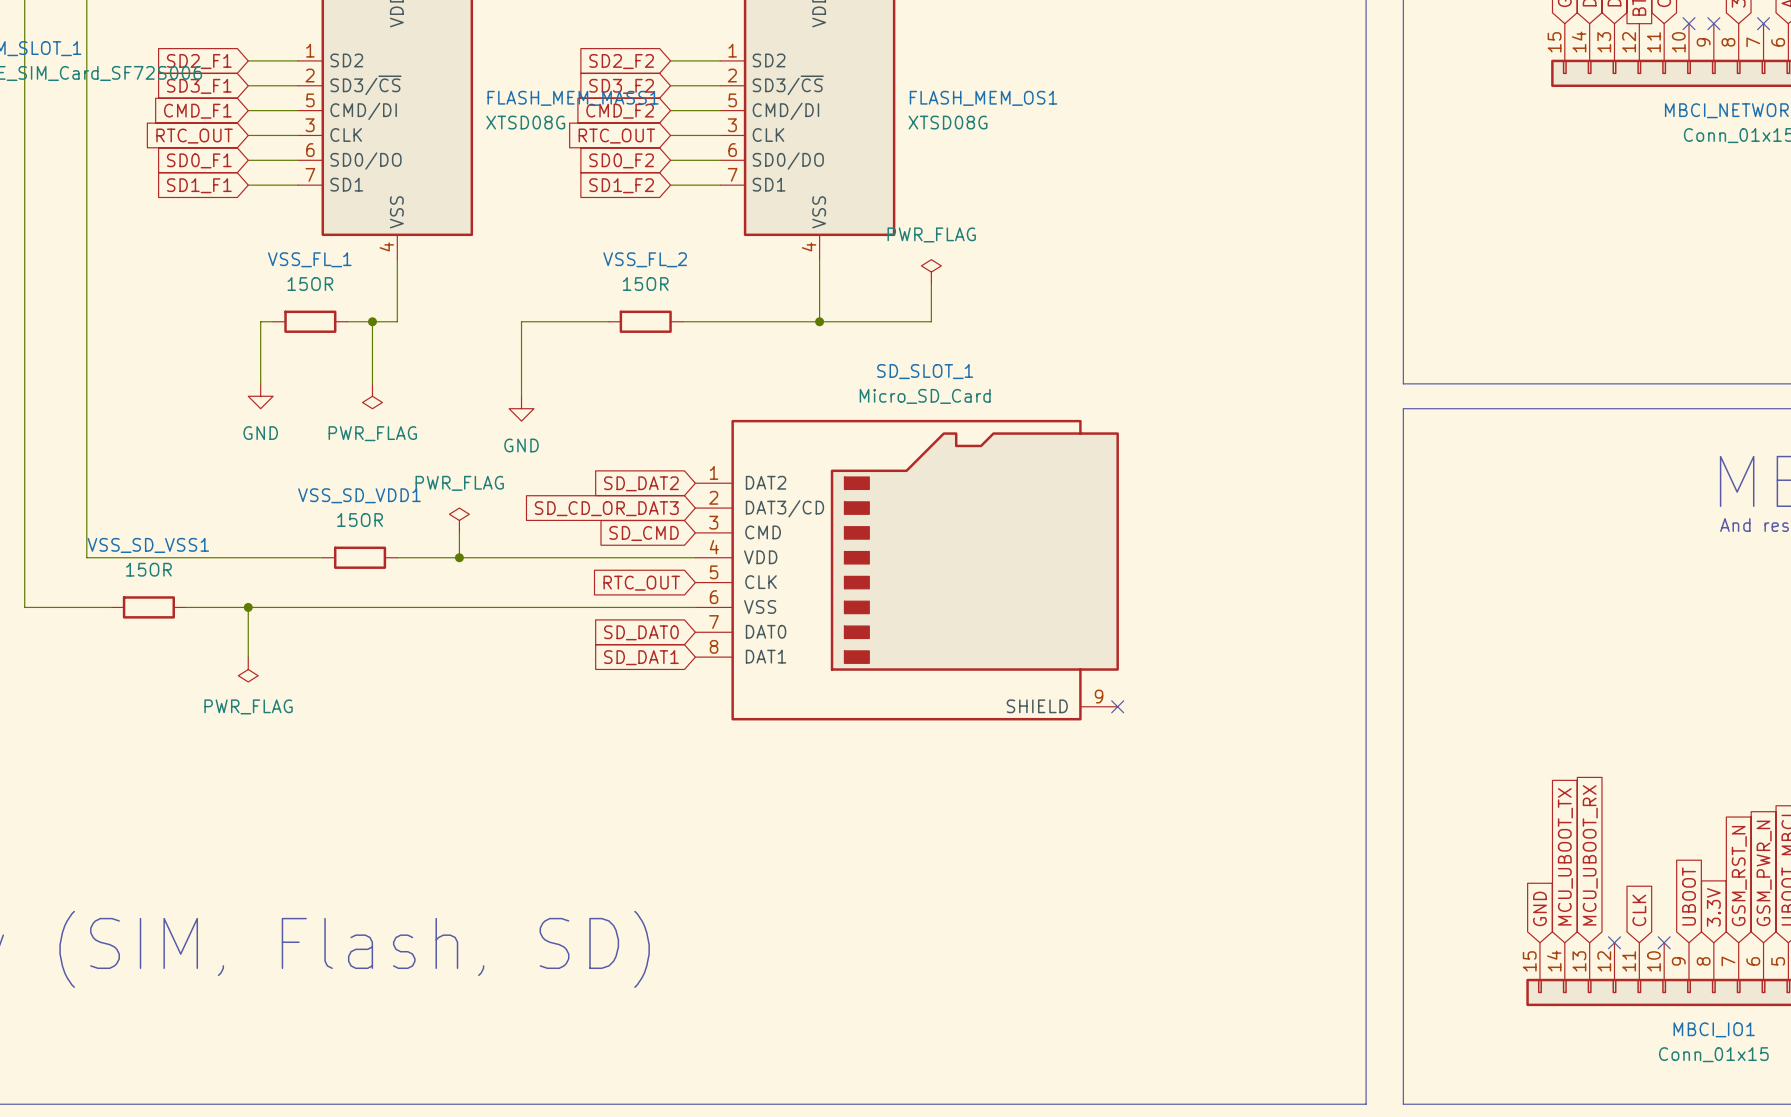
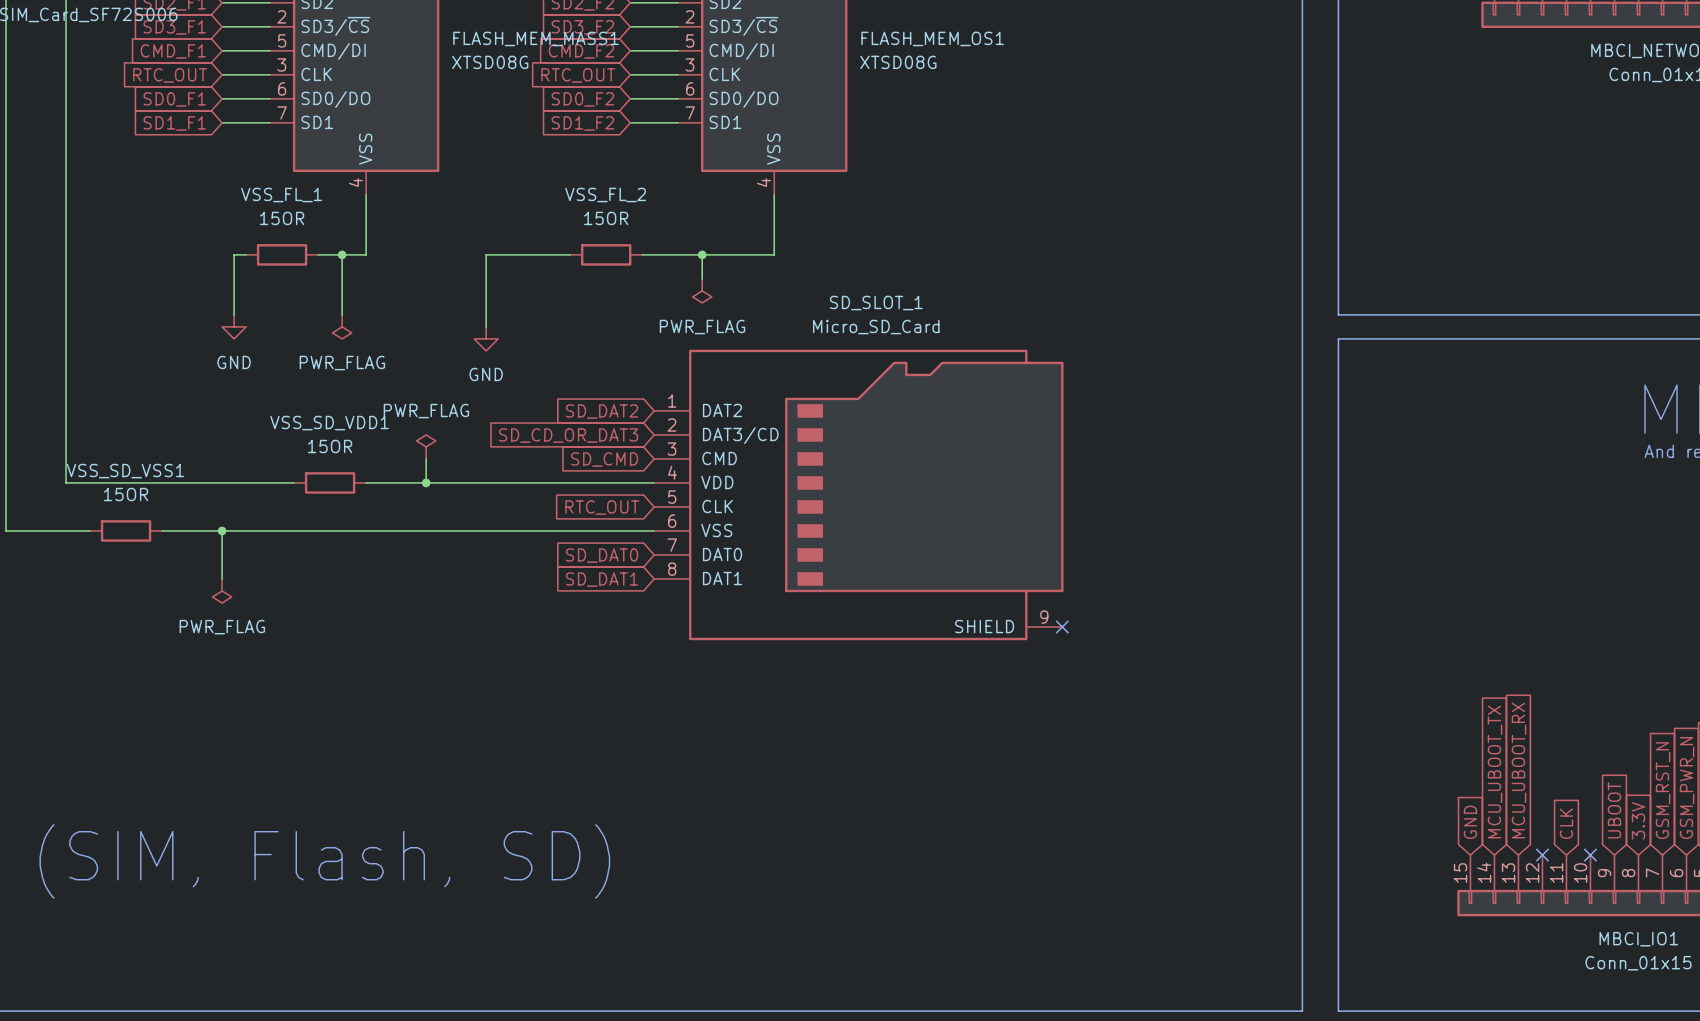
power symbol rotation: 0° (931, 272) -> 180° (702, 290)
power symbol position: PWR_FLAG (931, 272) -> PWR_FLAG (702, 290)
wire: (931, 284) (931, 321) (819, 321) -> none
wire: none -> (702, 254) (702, 278)
junction: none -> (702, 254)
junction: (819, 321) -> none

